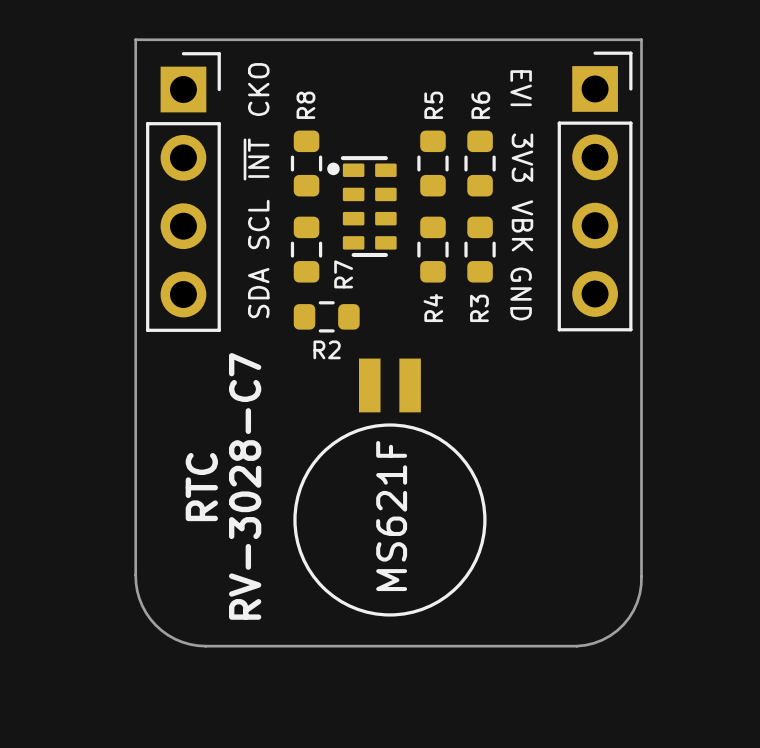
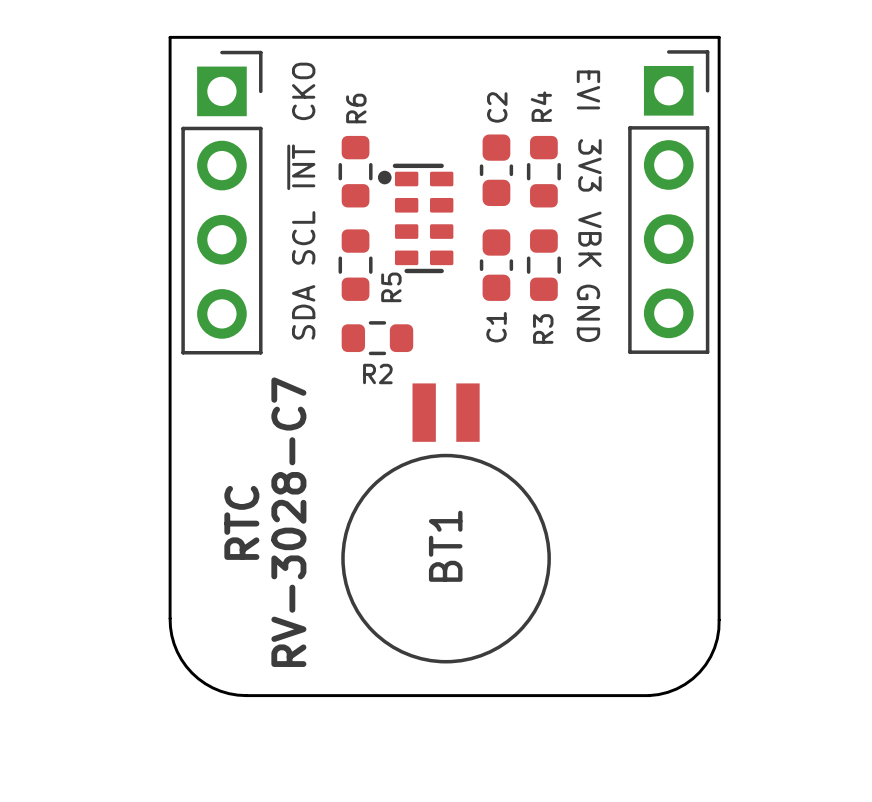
R8 name: R8 (305, 105) -> R6 (356, 108)
R6 name: R6 (480, 105) -> R4 (541, 106)
C2: none -> (496, 170)
R5: (432, 163) -> none
R4: (432, 249) -> none
C1: none -> (496, 265)
R7 name: R7 (343, 274) -> R5 (391, 287)
MS621F name: MS621F (391, 516) -> BT1 (445, 546)

